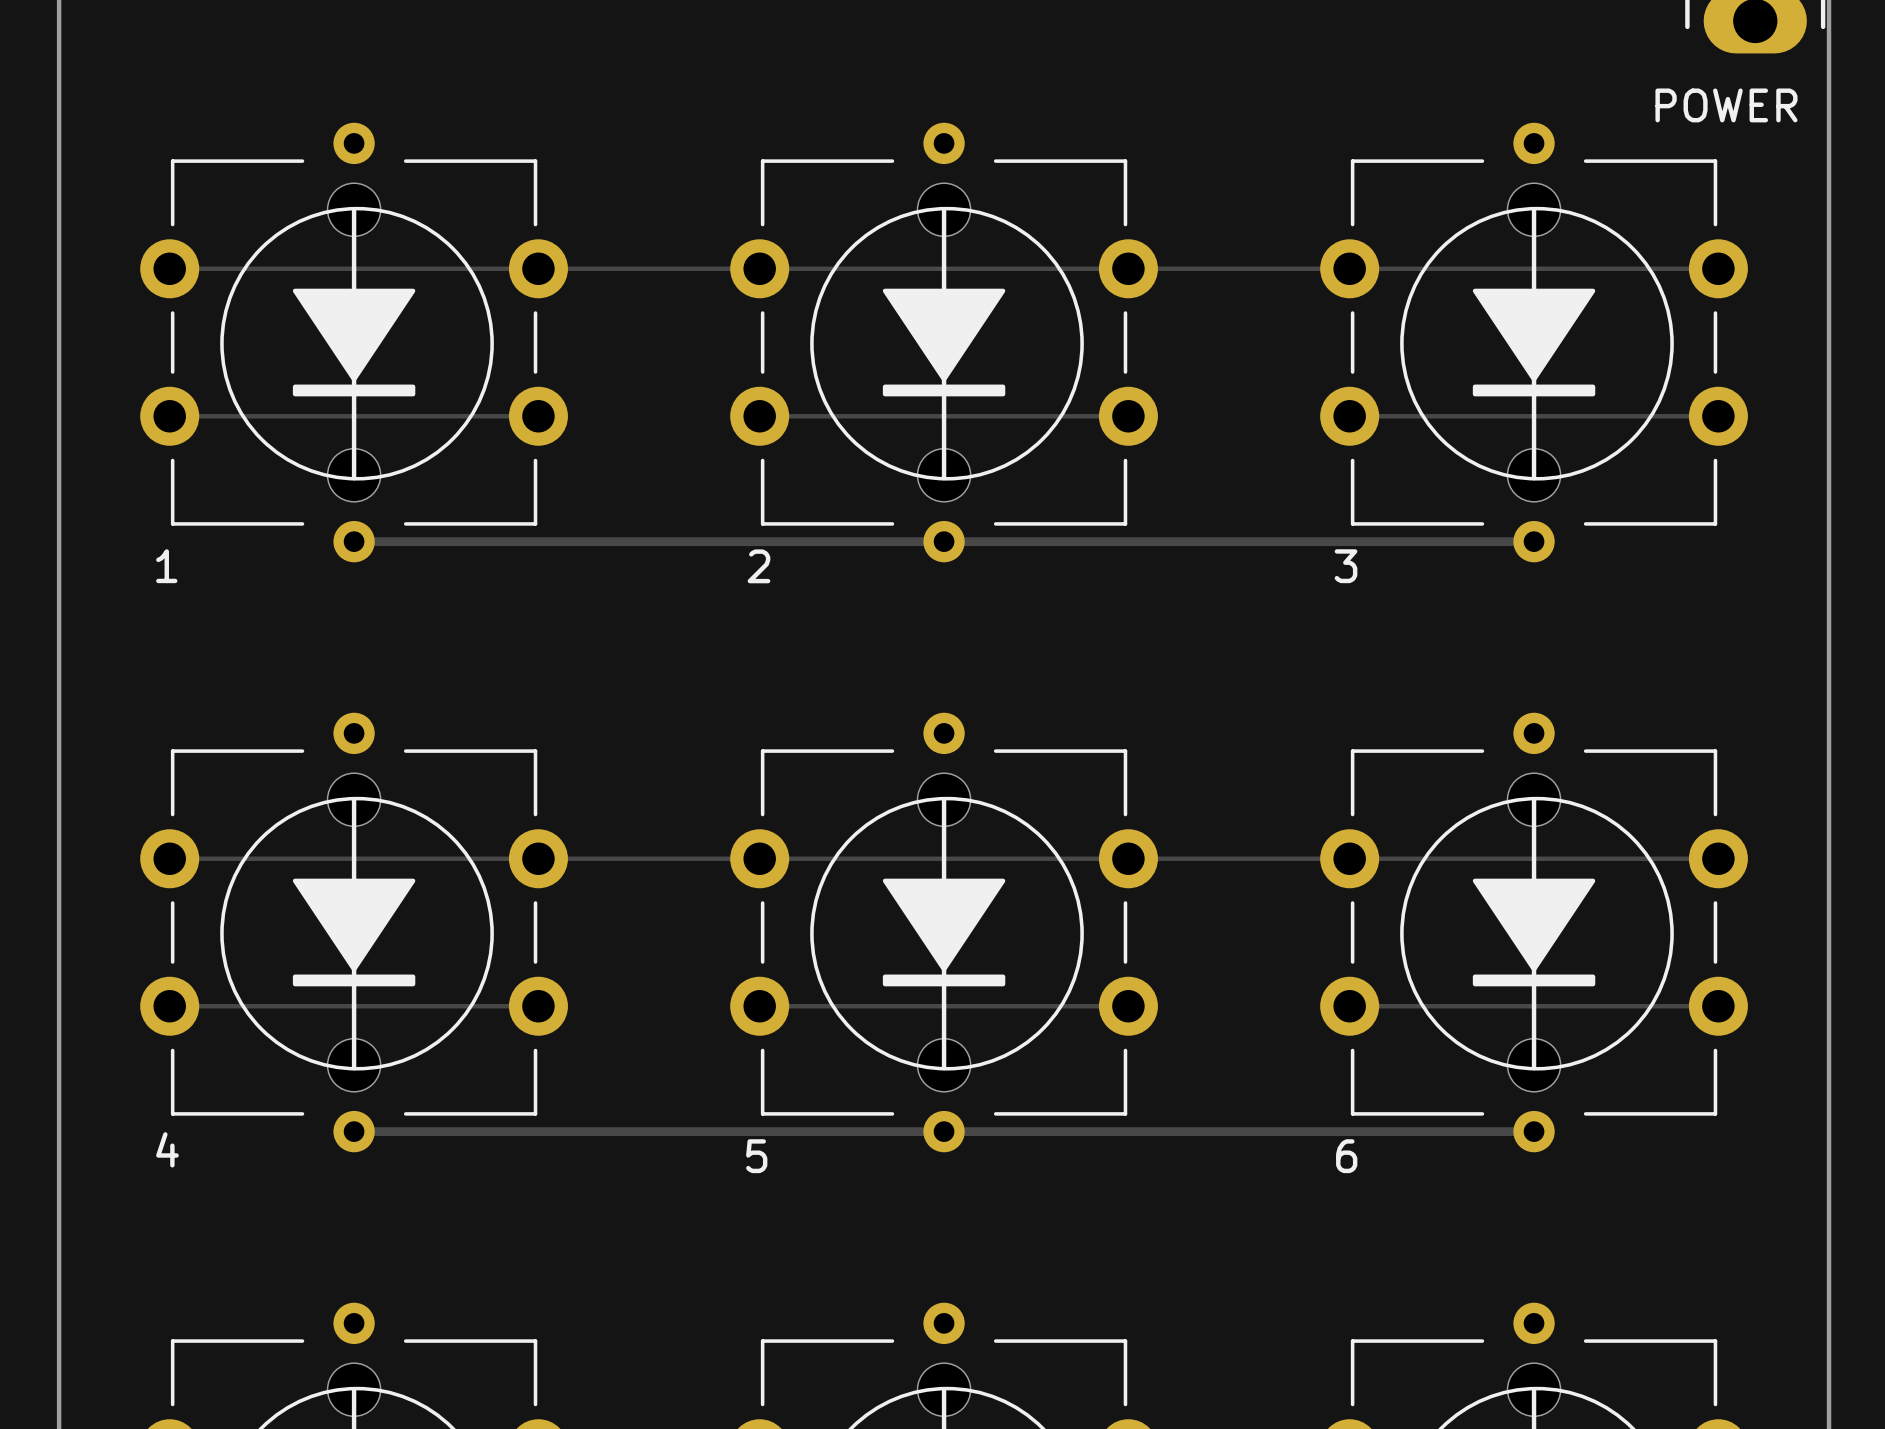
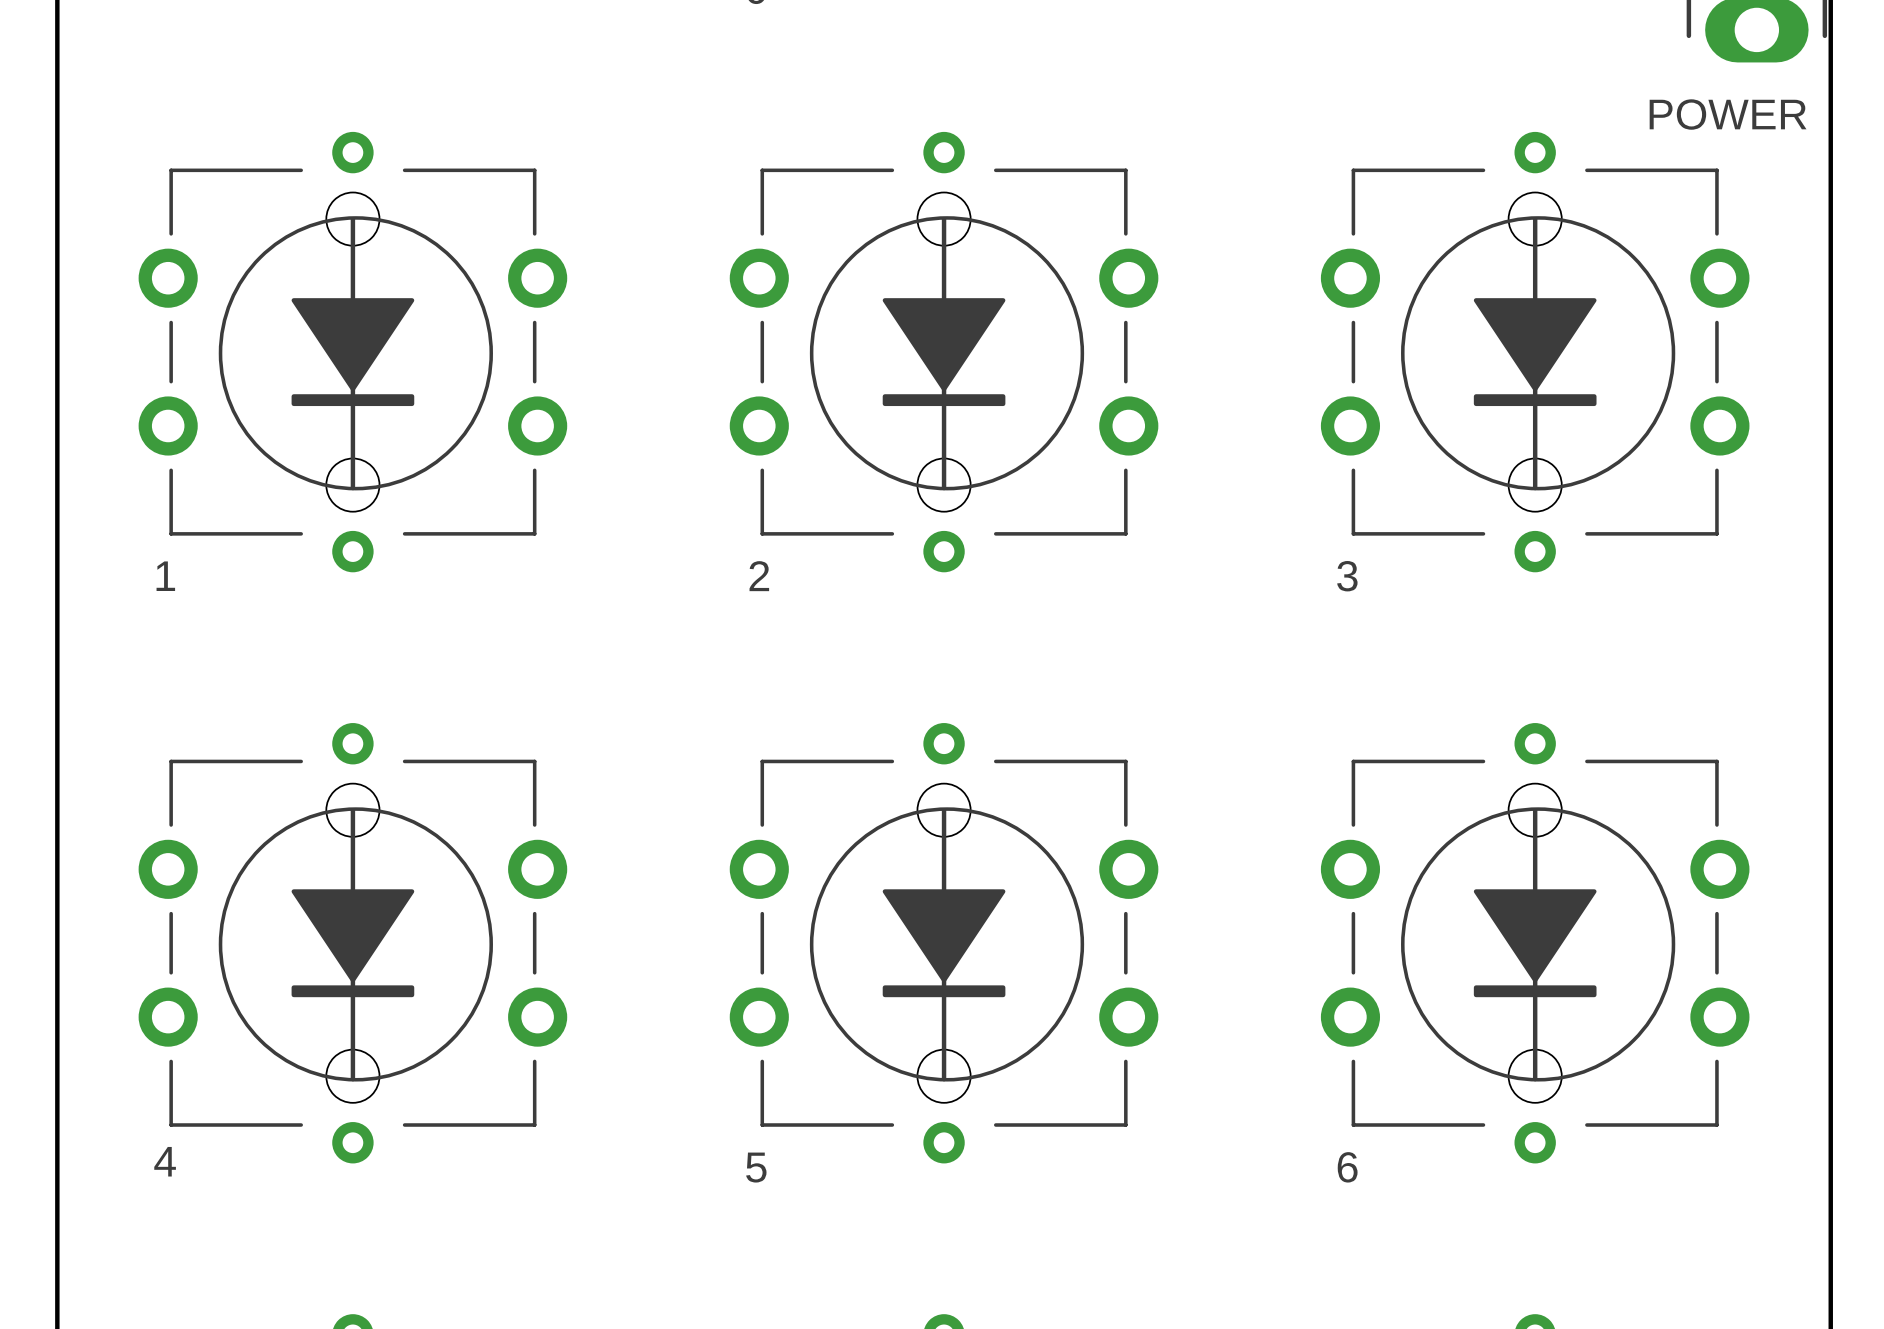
track: (169, 268) (1718, 268) -> none
track: (169, 416) (538, 416) -> none
track: (759, 416) (1128, 416) -> none
track: (1349, 416) (1718, 416) -> none
track: (354, 541) (1534, 541) -> none
track: (169, 858) (1718, 858) -> none
track: (169, 1006) (538, 1006) -> none
track: (759, 1006) (1128, 1006) -> none
track: (1349, 1006) (1718, 1006) -> none
track: (354, 1131) (1534, 1131) -> none

